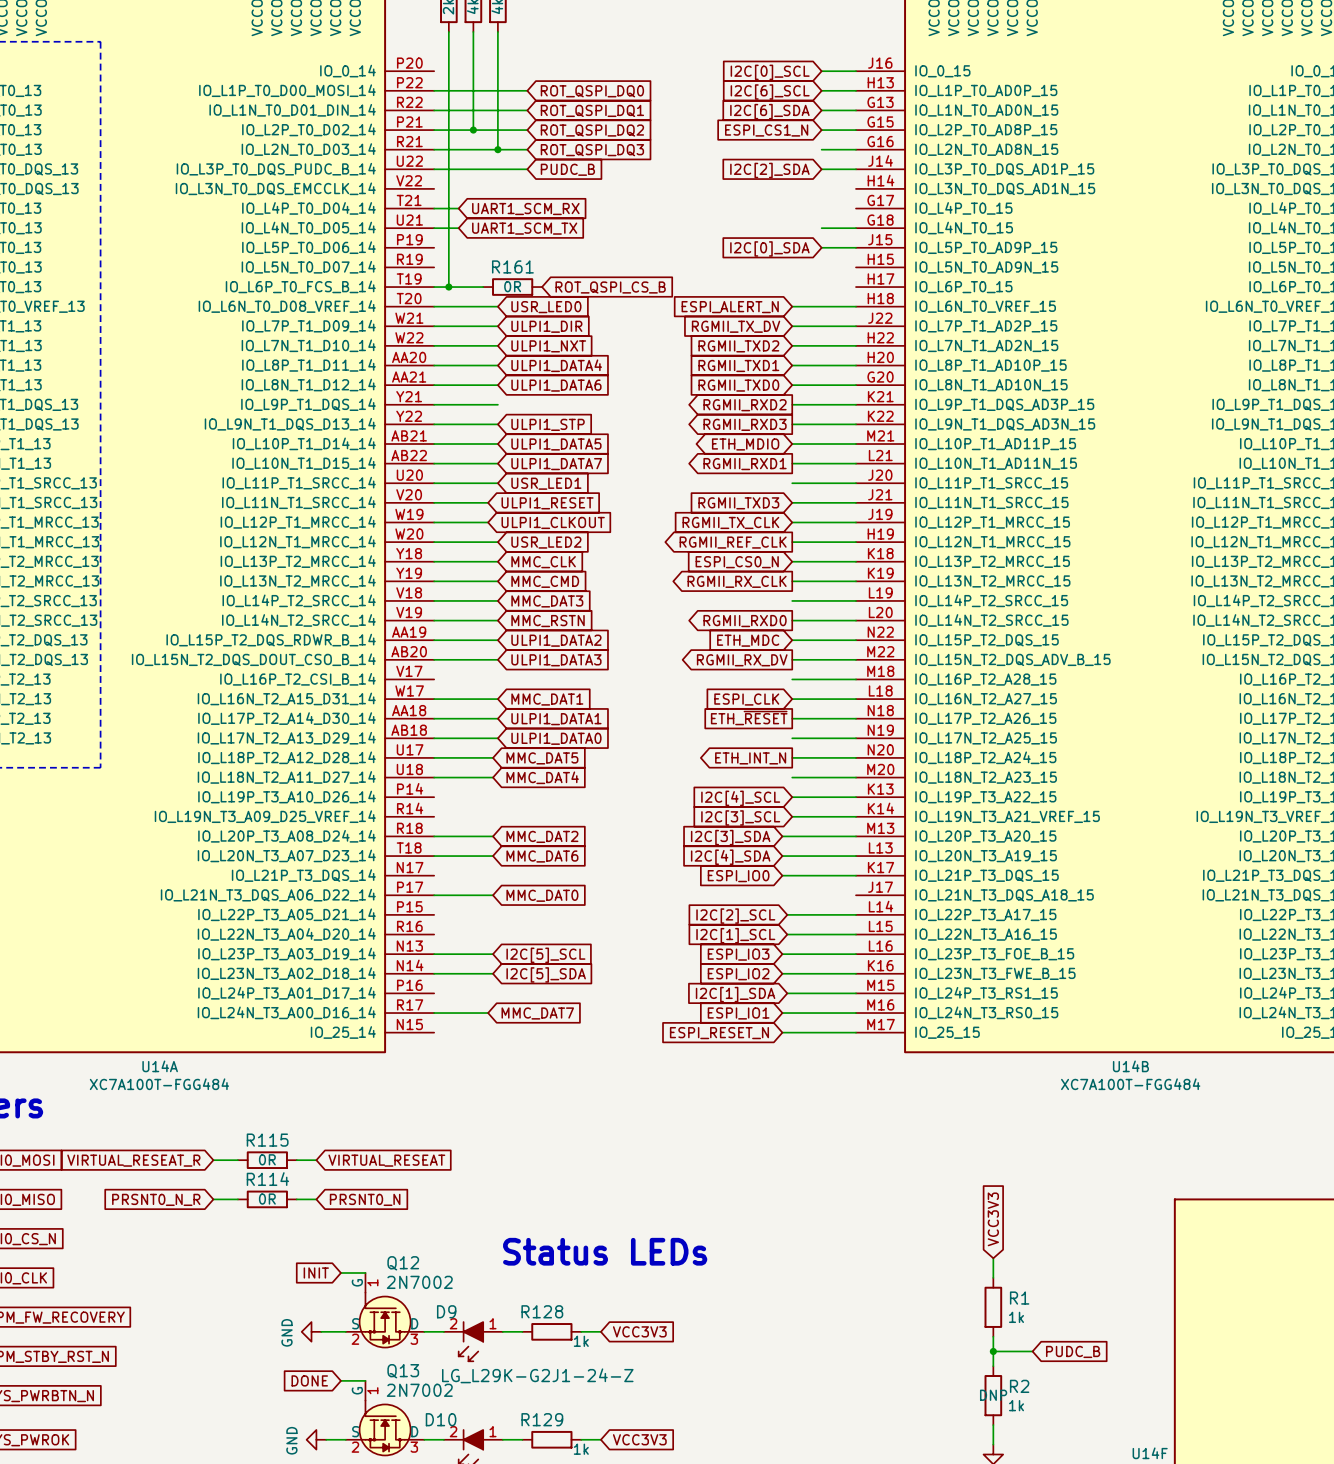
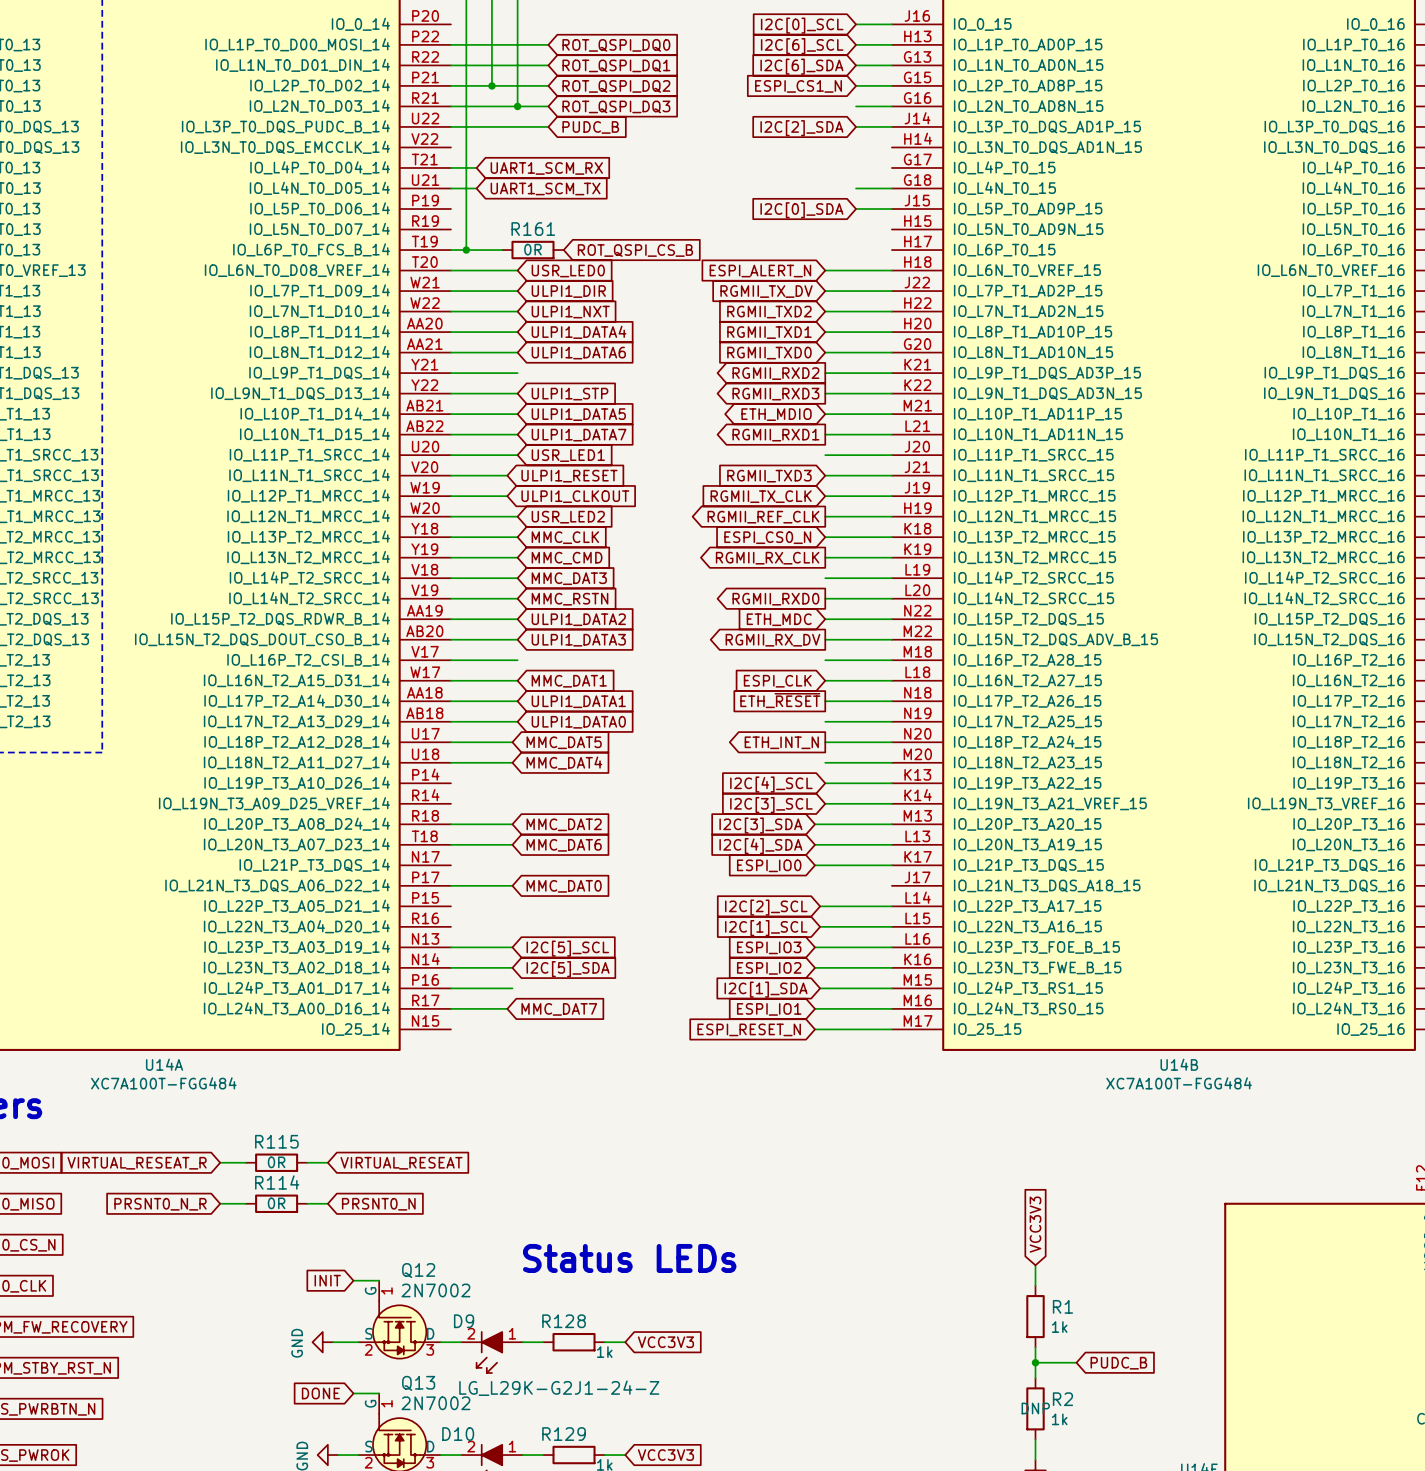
wire: none -> (450, 660) (517, 660)
wire: none -> (450, 988) (512, 988)

